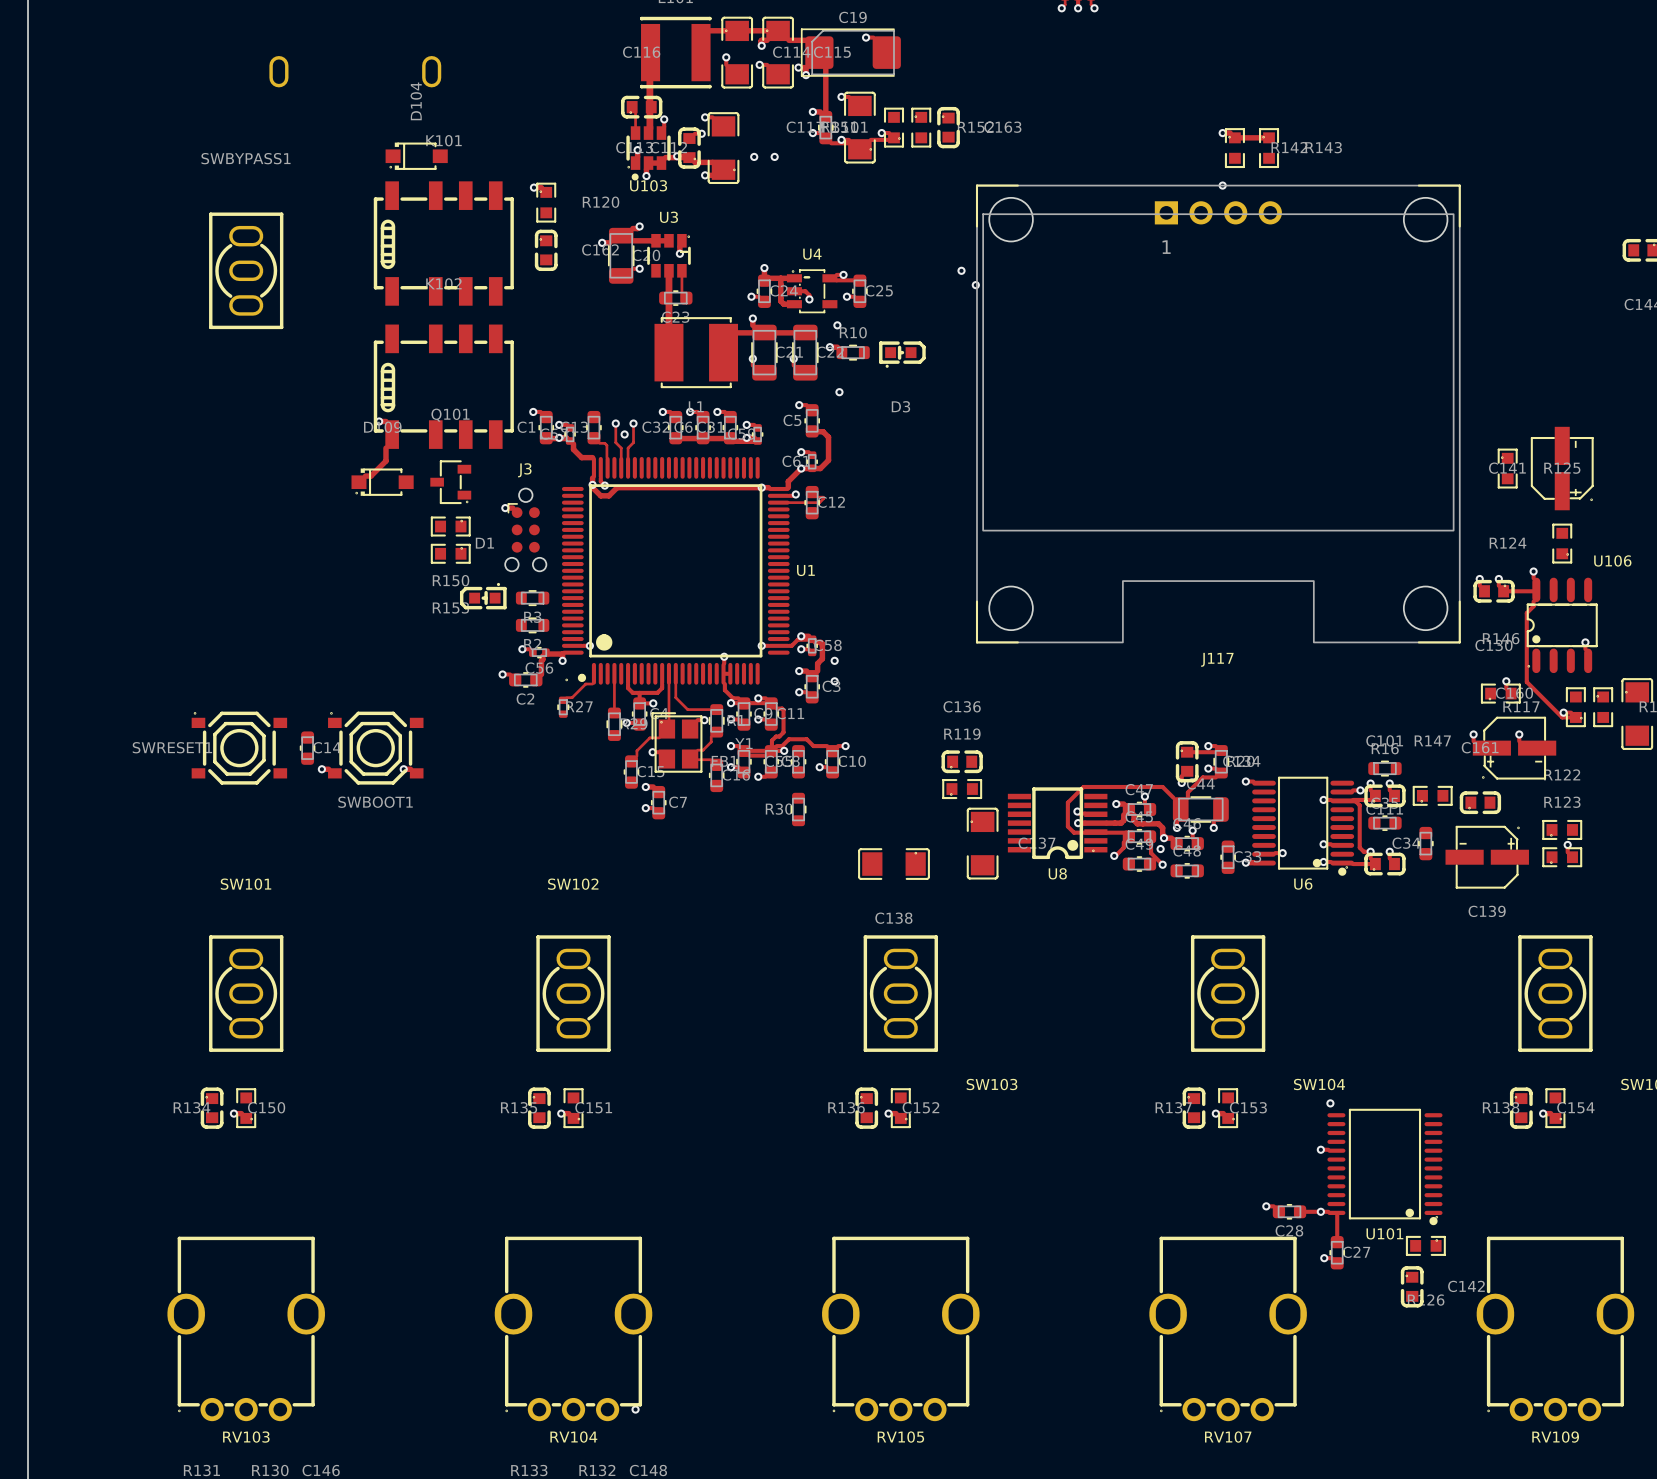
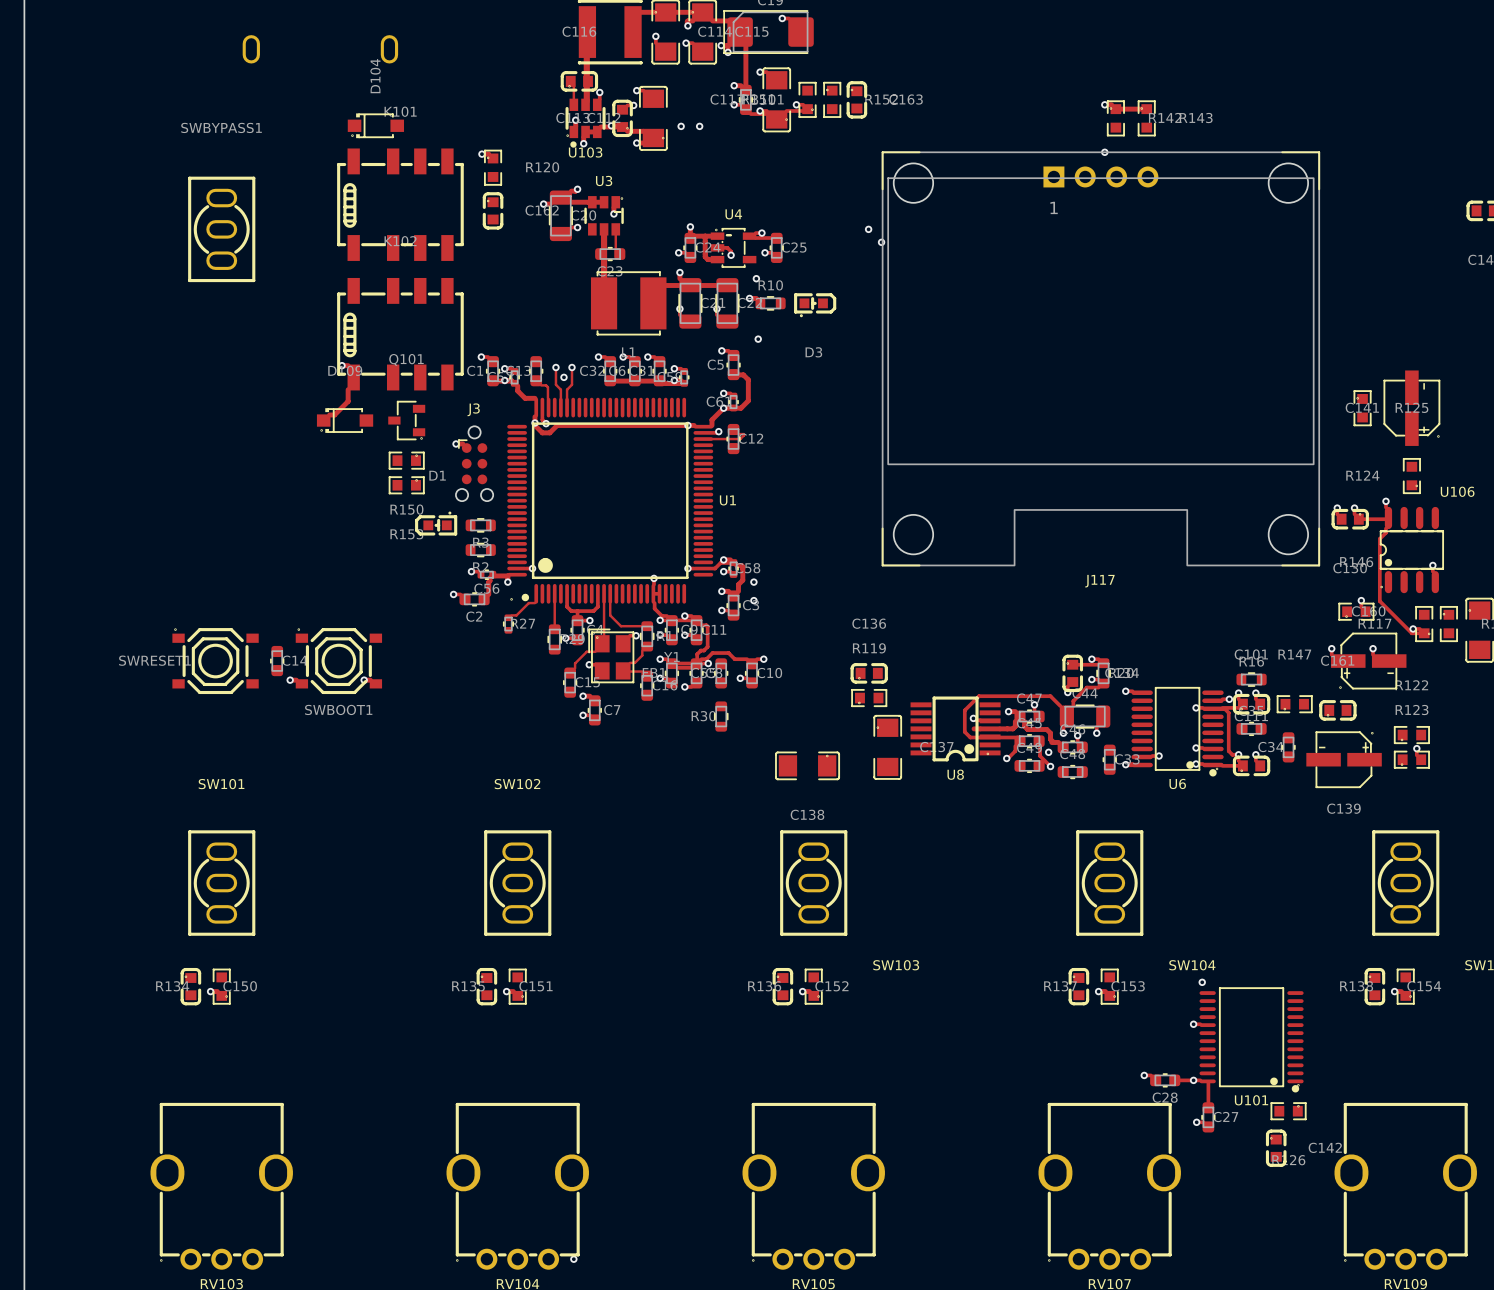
via: (1078, 823) -> none
via: (1164, 838) -> none

